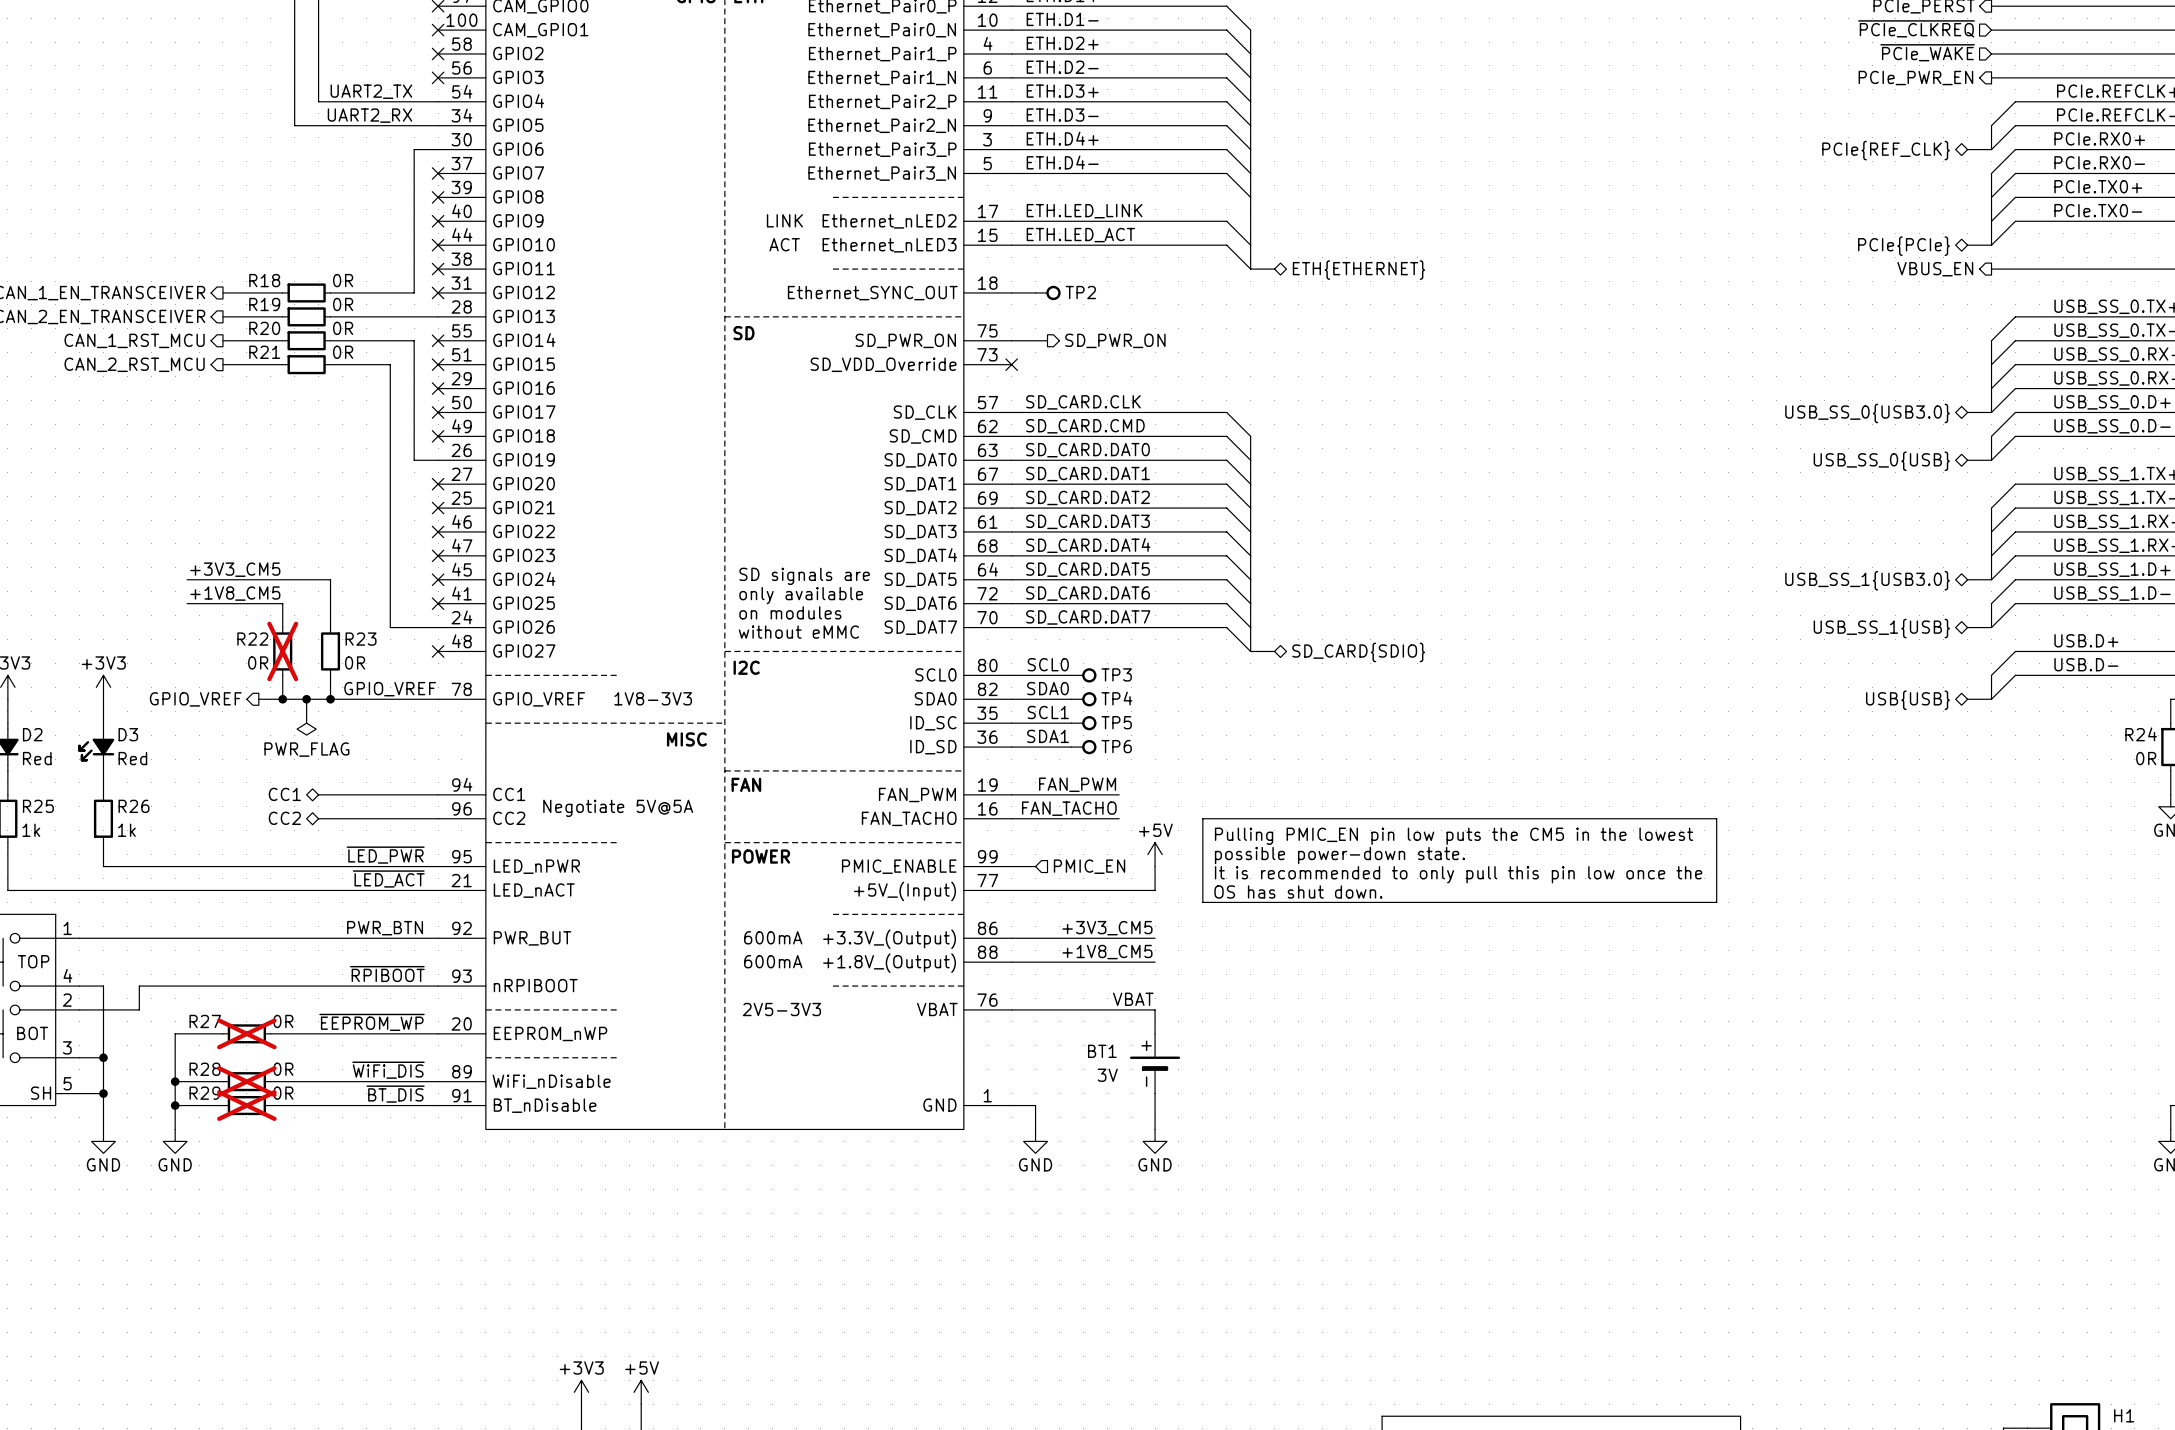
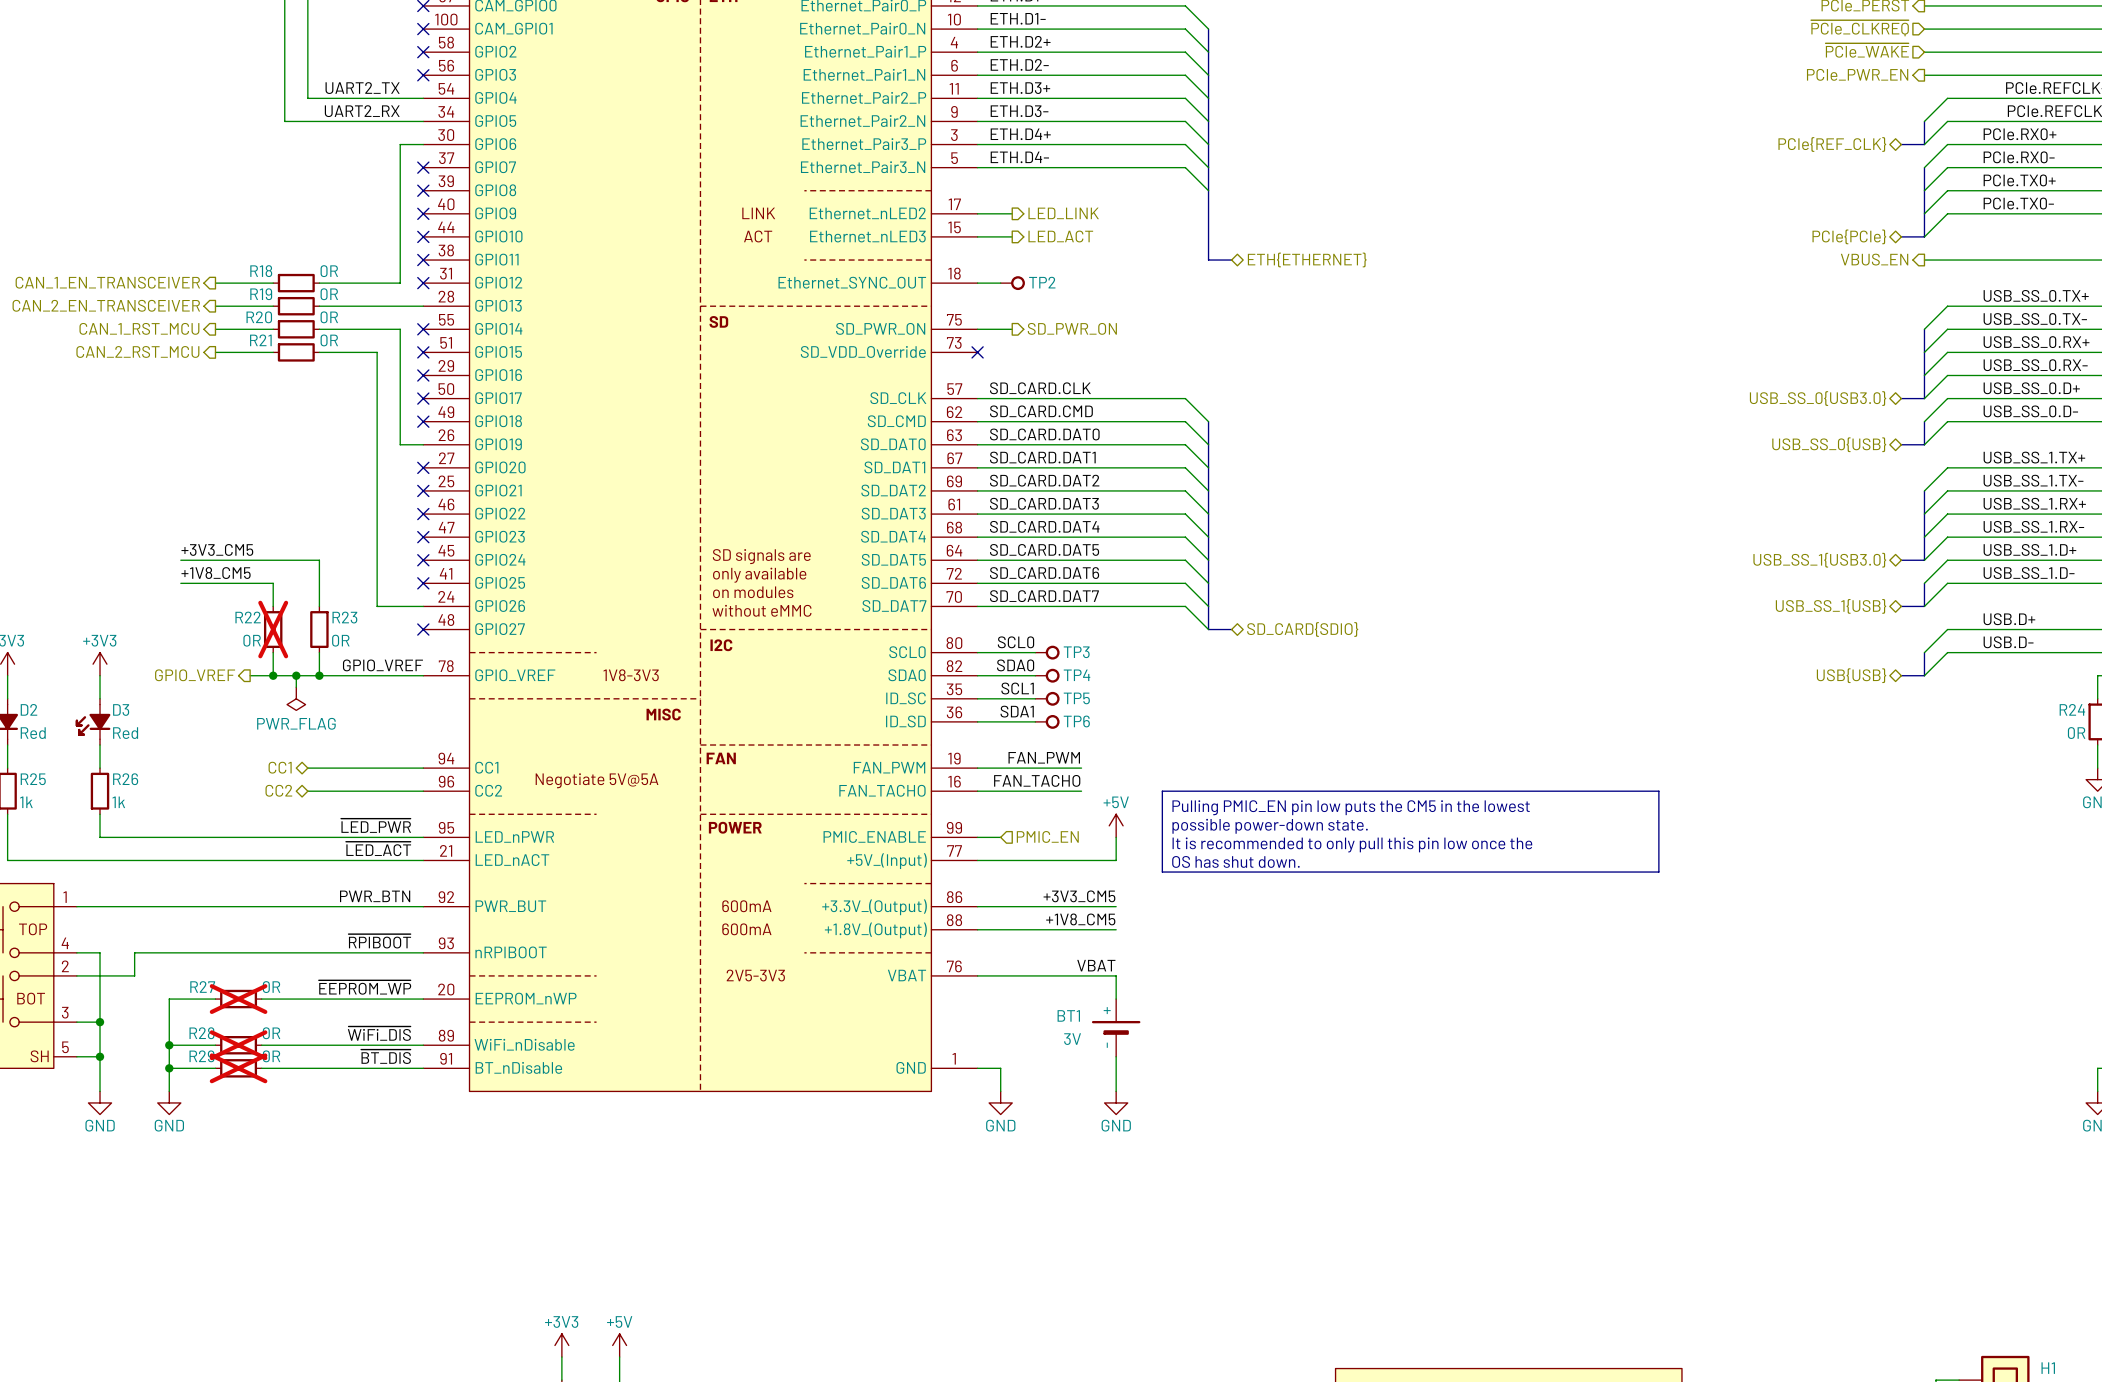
label: ETH.LED_LINK (1084, 211) -> none
wire: (1047, 221) (1226, 221) (1250, 245) -> none
hierarchical label: none -> LED_LINK (1063, 213)
label: ETH.LED_ACT (1080, 235) -> none
wire: (1047, 245) (1226, 245) (1250, 269) -> none
hierarchical label: none -> LED_ACT (1060, 236)

